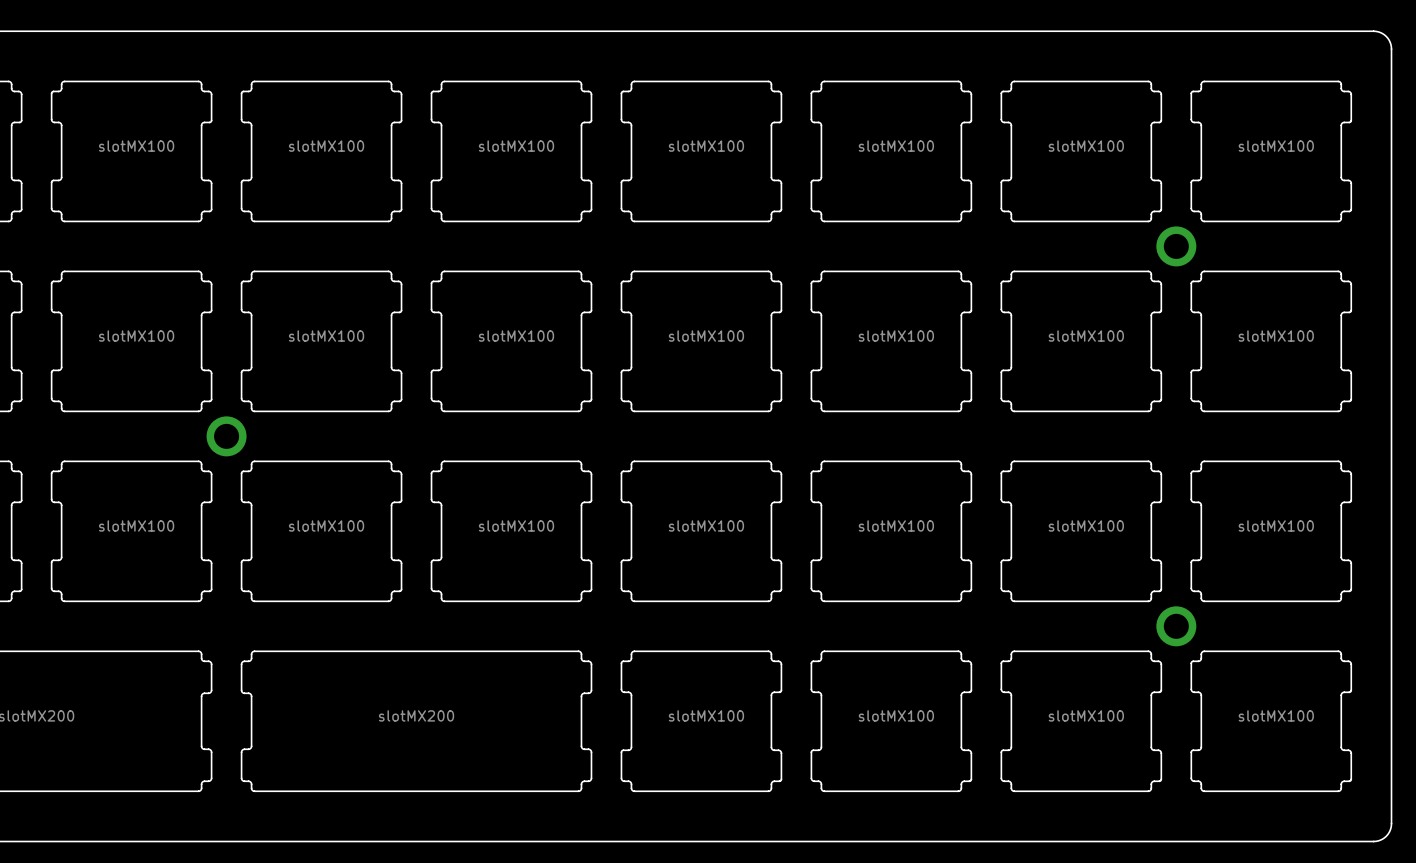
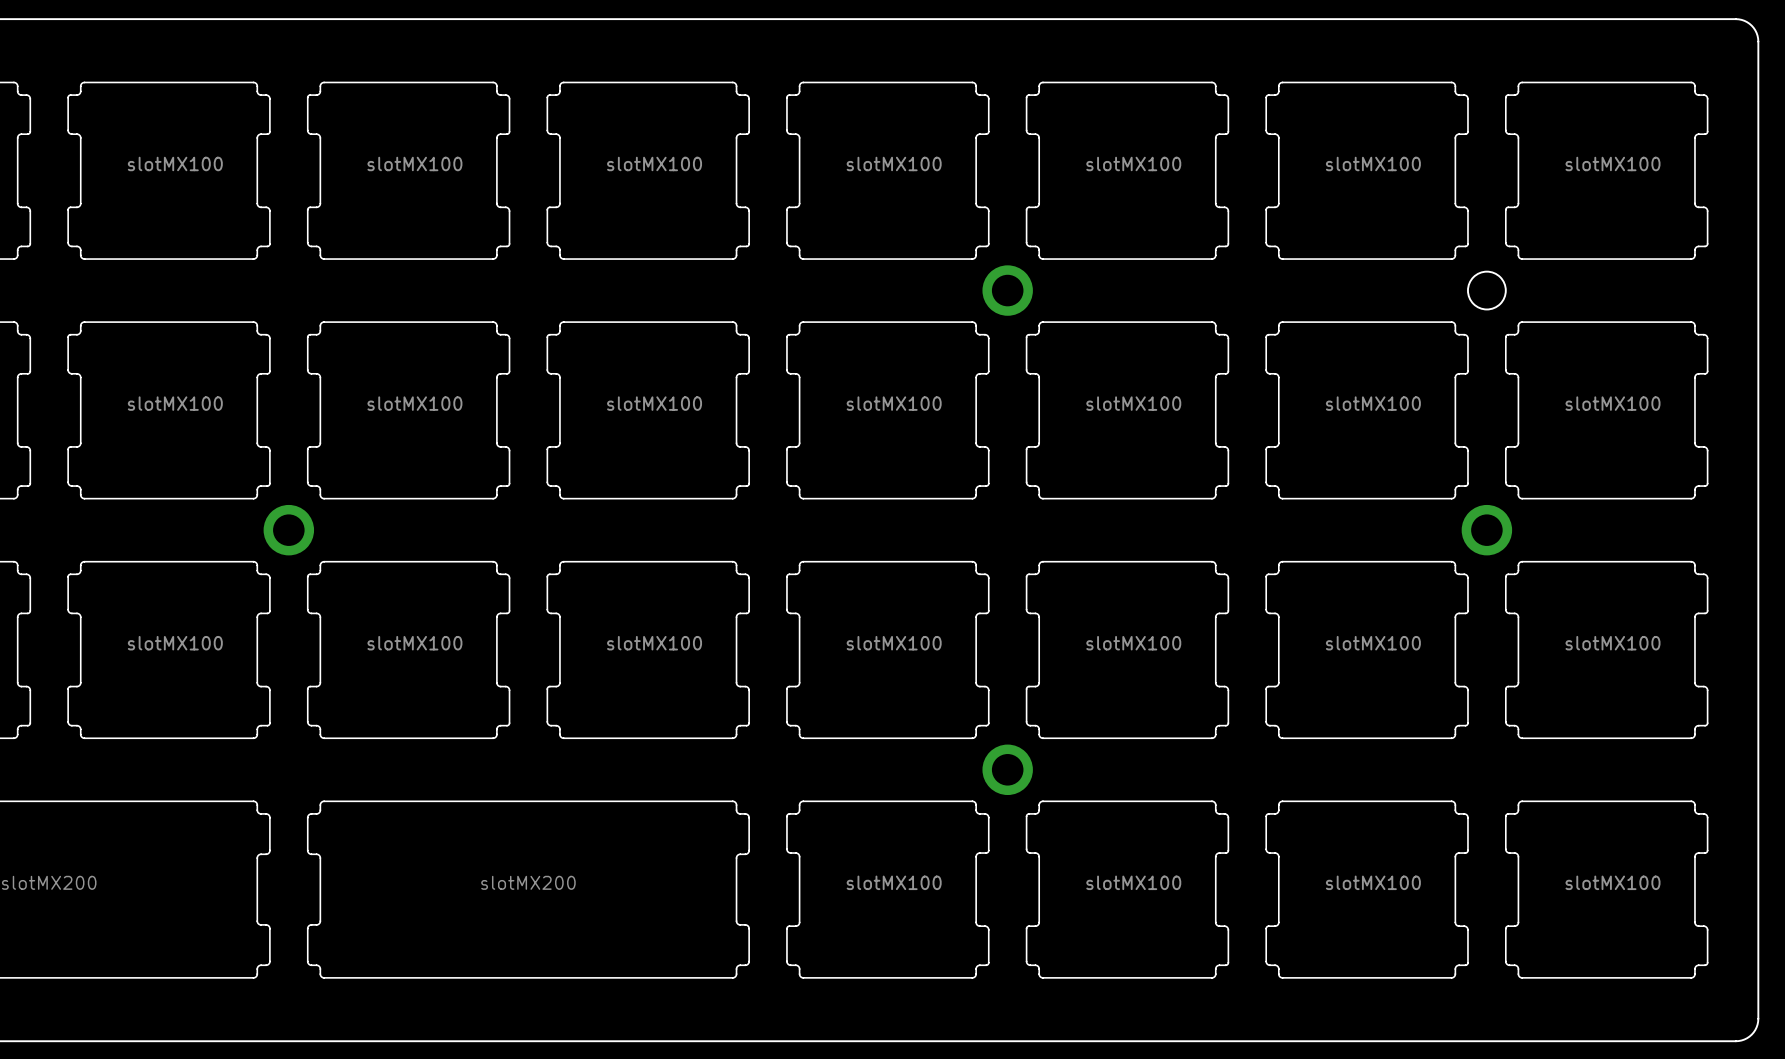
round board edge: none -> [1467, 270, 1507, 311]
via: none -> (1007, 290)
via: (1176, 246) -> none
via: none -> (1486, 530)
via: none -> (1007, 769)
via: (1176, 626) -> none

